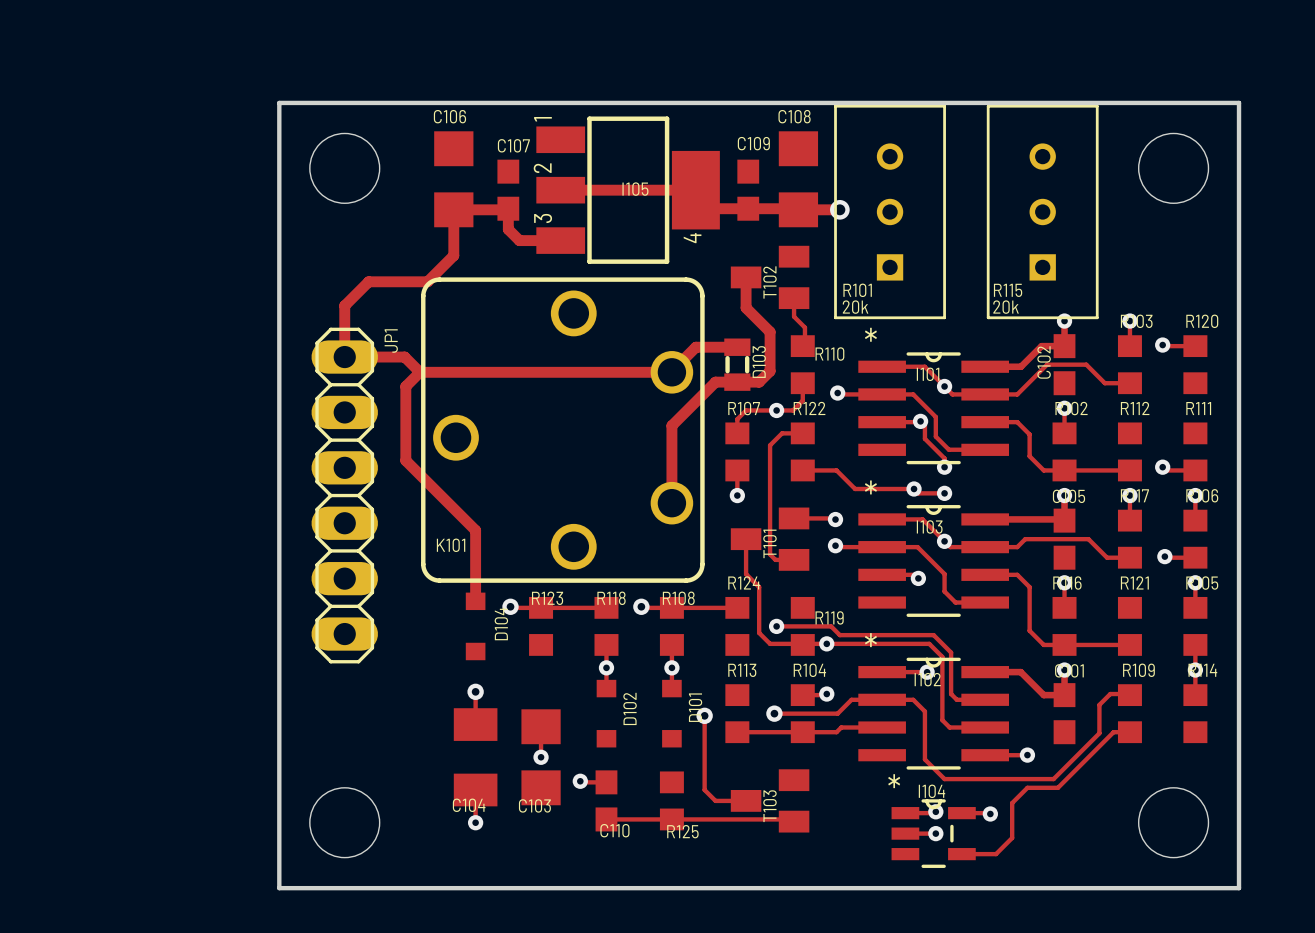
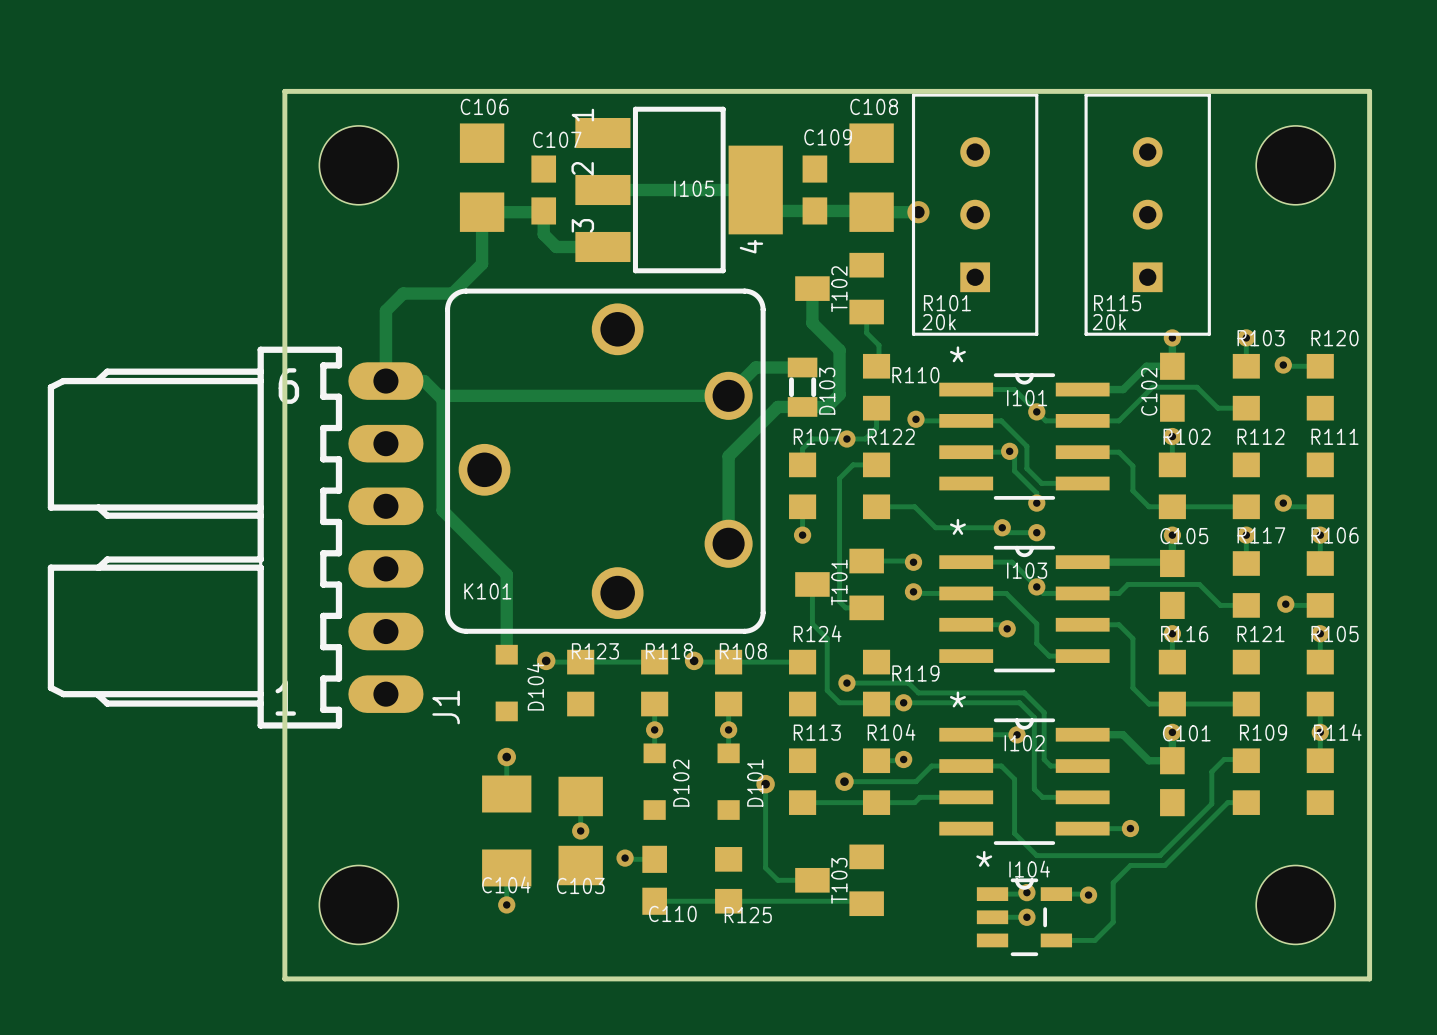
track: (384, 281) (368, 281) (344, 305) (344, 357) (404, 357) (420, 372) (405, 386) (405, 460) (418, 473) -> (443, 395) (442, 510)
track: none -> (403, 293) (385, 310) (385, 381) (424, 381) (441, 398)
JP1: (344, 495) -> none
J1: none -> (235, 537)

